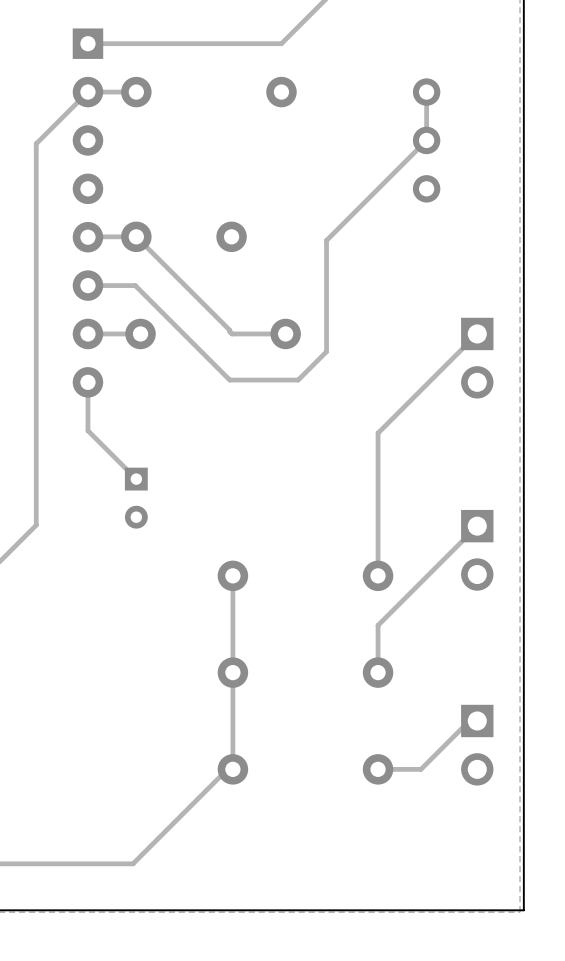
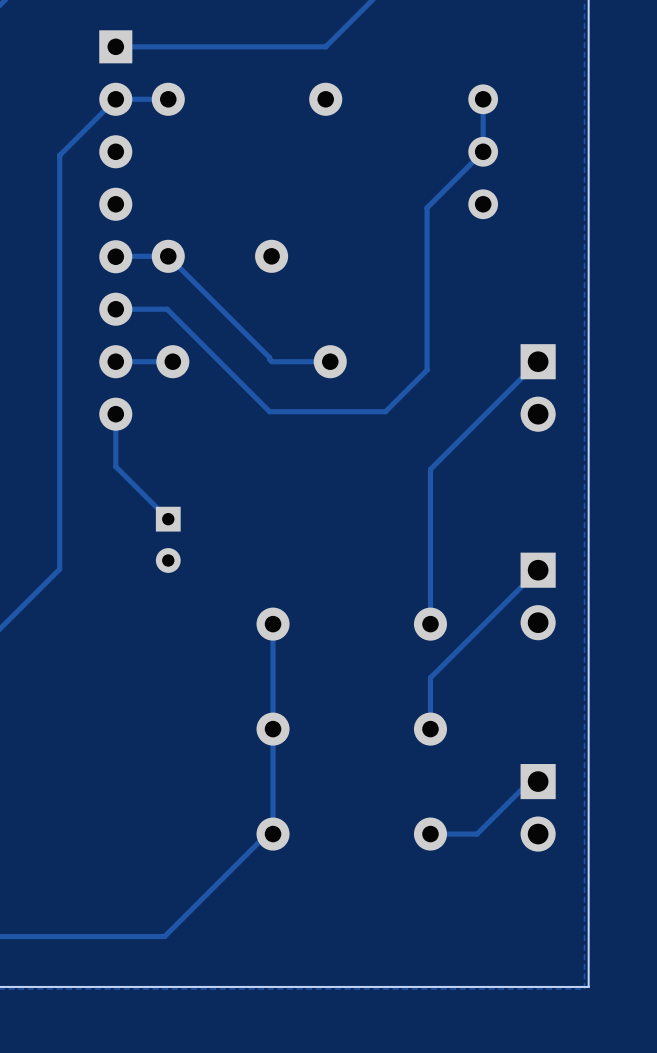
track: (374, 192) (326, 240) (326, 351) (298, 380) -> (427, 207) (427, 370) (385, 411) (343, 411)

